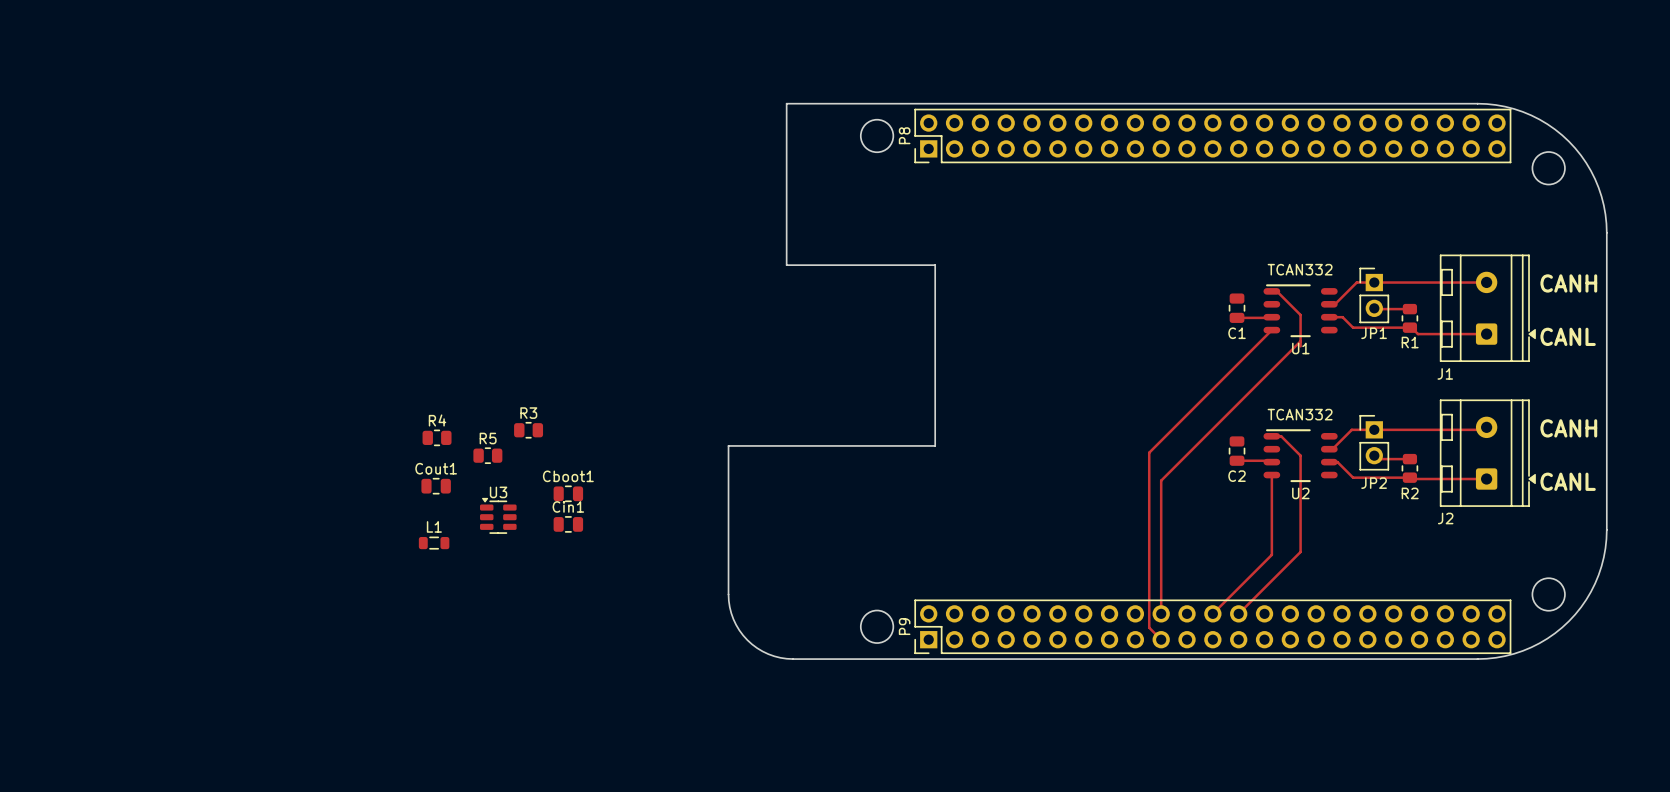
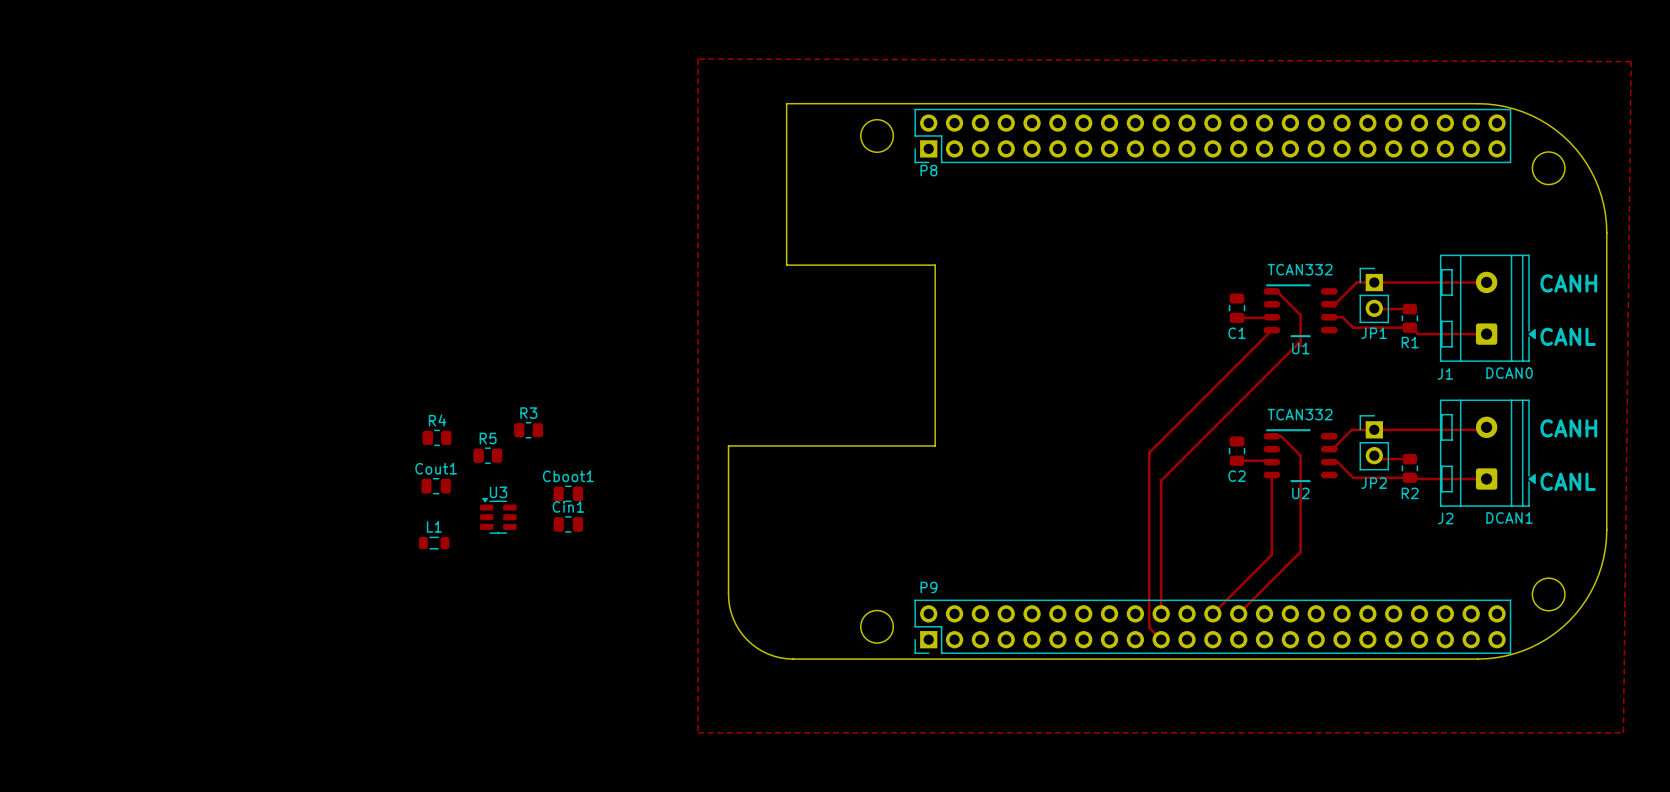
zone outline: none -> (698, 59) (698, 732) (1623, 732) (1631, 61) (698, 59)
P8 name rotation: 0° (904, 135) -> 90° clockwise (928, 170)
P8 name position: P8 (904, 135) -> P8 (928, 170)
text: none -> DCAN0 (1509, 373)
text: none -> DCAN1 (1509, 517)
P9 name rotation: 0° (904, 626) -> 90° clockwise (928, 587)
P9 name position: P9 (904, 626) -> P9 (928, 587)

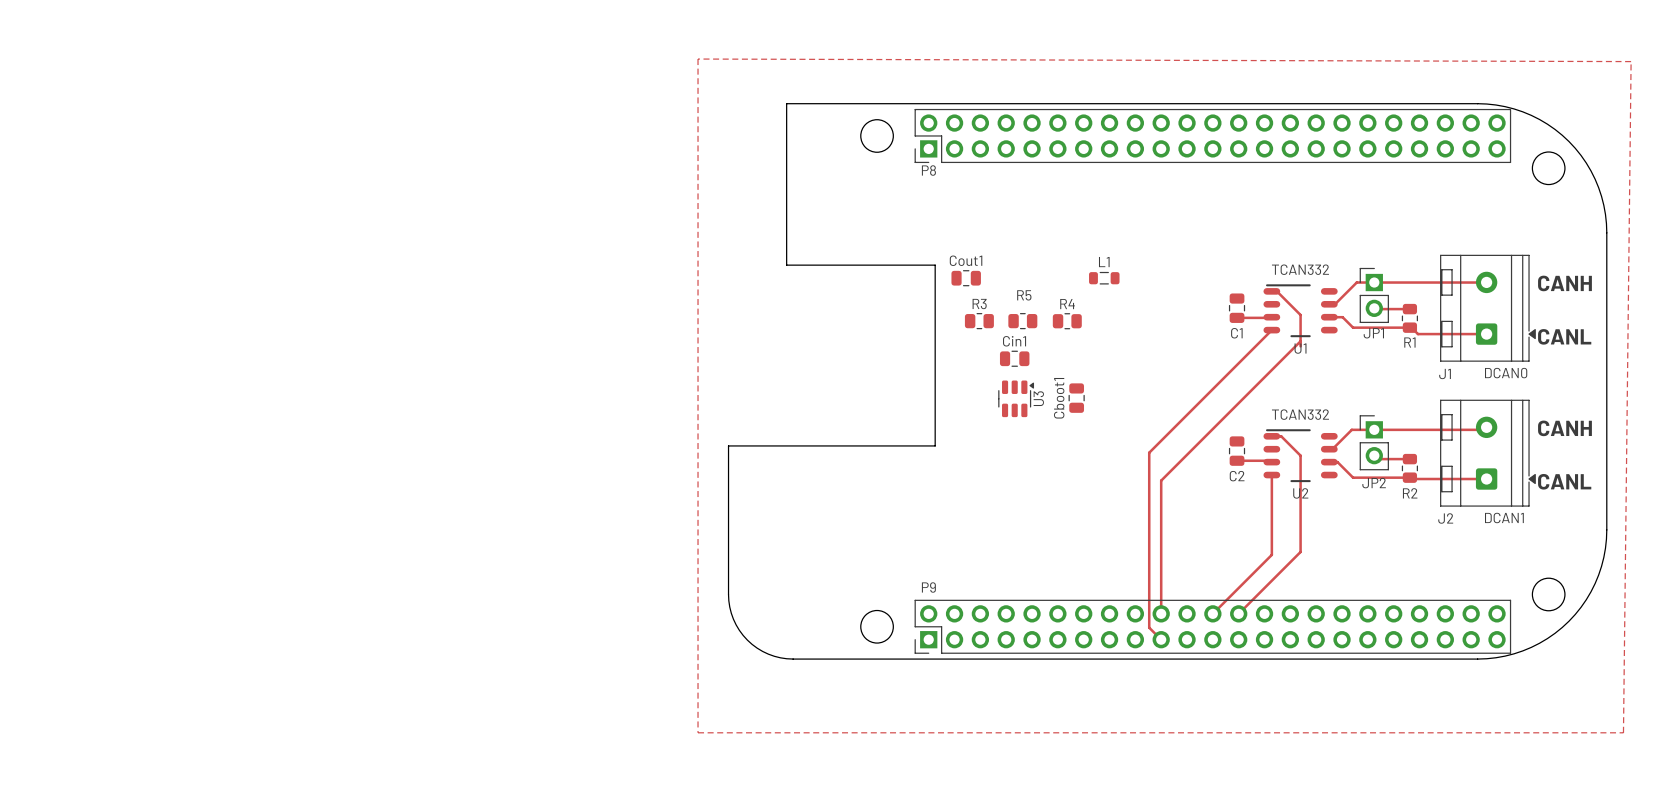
R3 position: (528, 430) -> (979, 321)
R4 position: (437, 437) -> (1067, 321)
R5 name position: R5 (488, 438) -> R5 (1024, 295)
R5 position: (487, 455) -> (1022, 321)
Cboot1 name position: Cboot1 (568, 476) -> Cboot1 (1059, 398)
Cout1 position: (436, 486) -> (966, 278)
Cboot1 rotation: 0° (568, 493) -> 90° clockwise (1076, 398)
Cboot1 position: (568, 493) -> (1076, 398)
U3 rotation: 0° (498, 515) -> 90° clockwise (1016, 398)
U3 position: (498, 515) -> (1016, 398)
Cin1 position: (568, 524) -> (1014, 358)
L1 position: (434, 543) -> (1104, 278)

